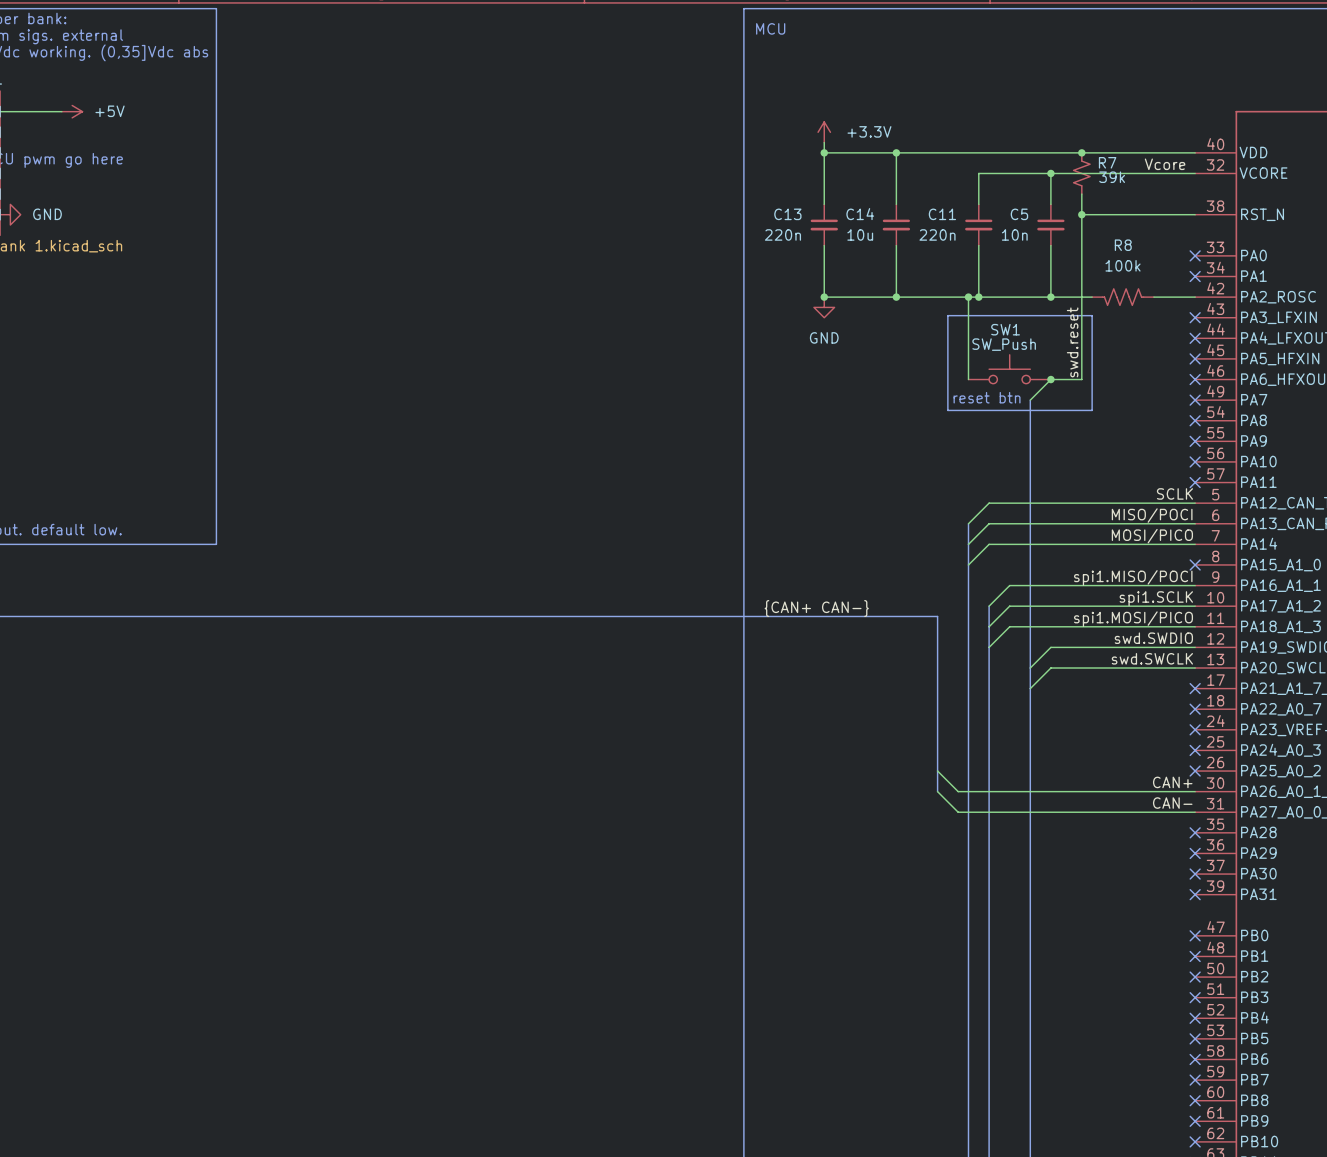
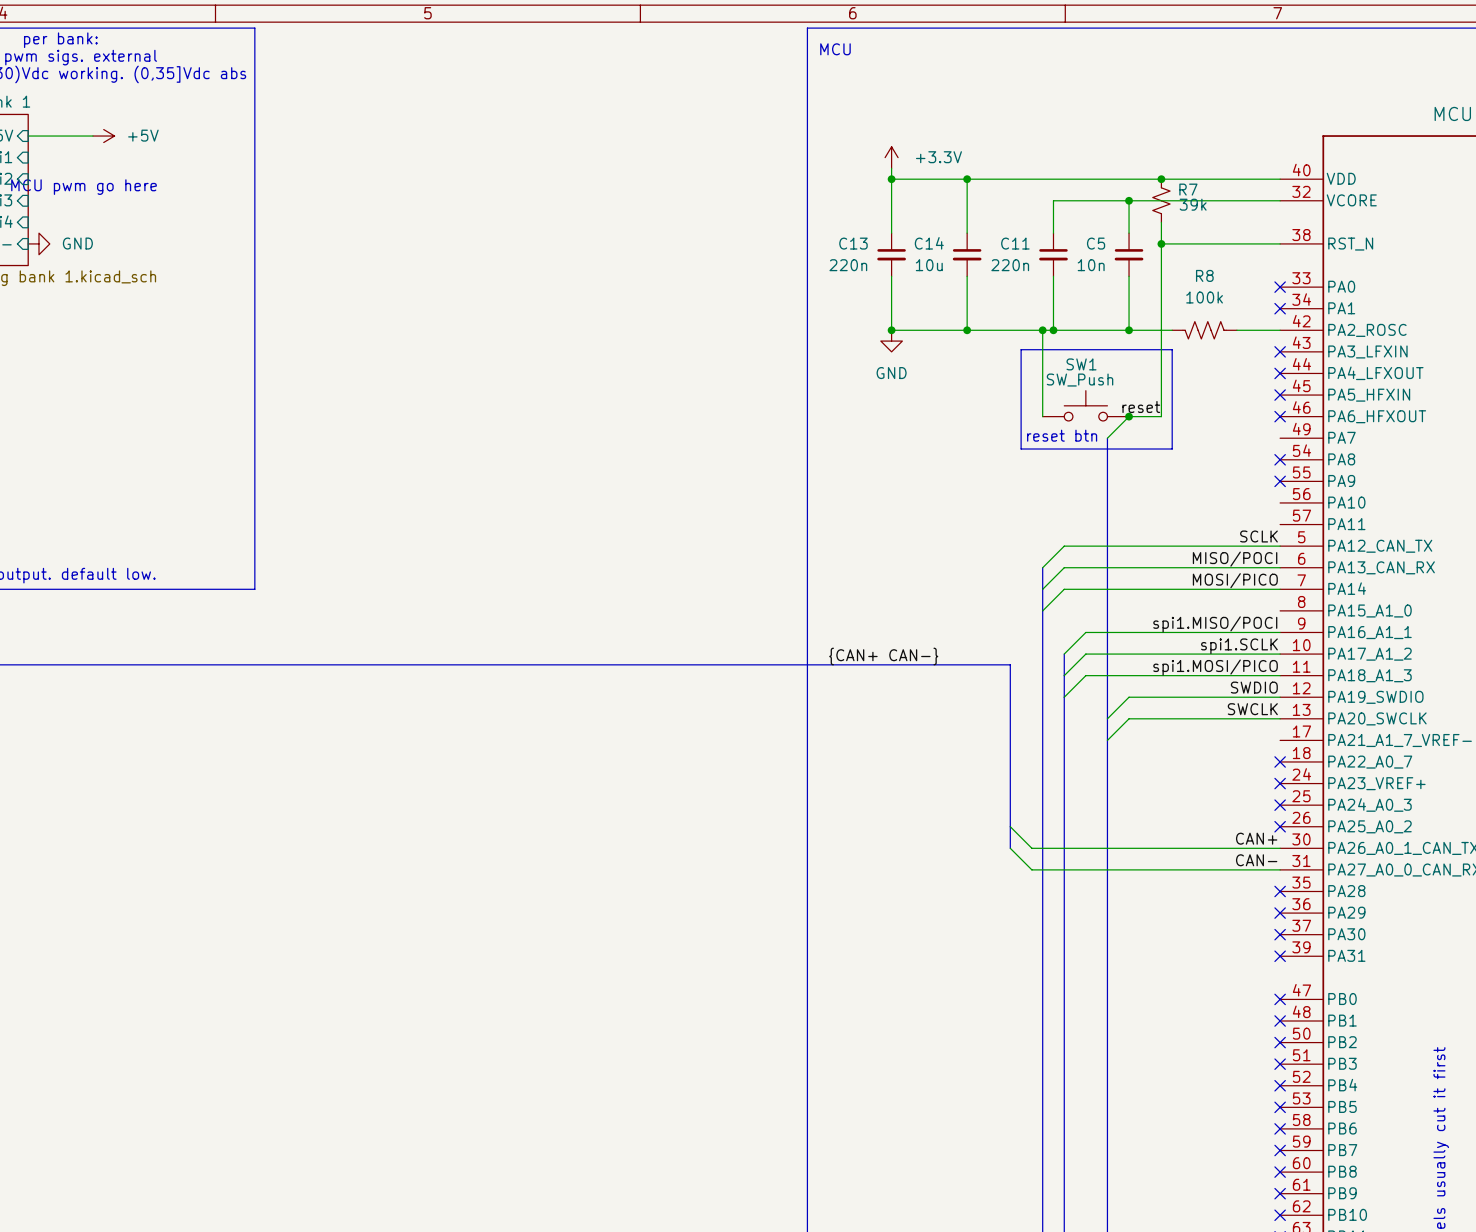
label: Vcore (1165, 164) -> none
label: swd.reset (1072, 342) -> reset (1141, 406)
no-connect mark: (1195, 400) -> none
no-connect mark: (1195, 461) -> none
no-connect mark: (1195, 482) -> none
no-connect mark: (1195, 564) -> none
label: swd.SWDIO (1153, 638) -> SWDIO (1254, 687)
label: swd.SWCLK (1152, 658) -> SWCLK (1252, 709)
no-connect mark: (1195, 688) -> none

